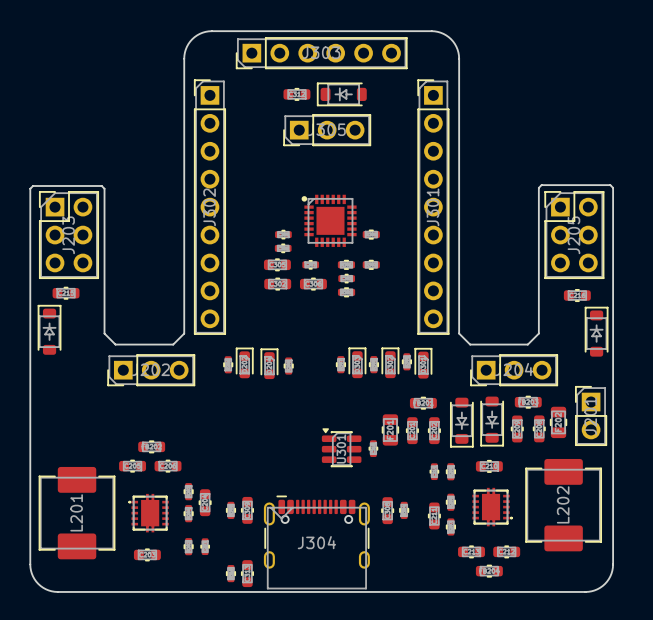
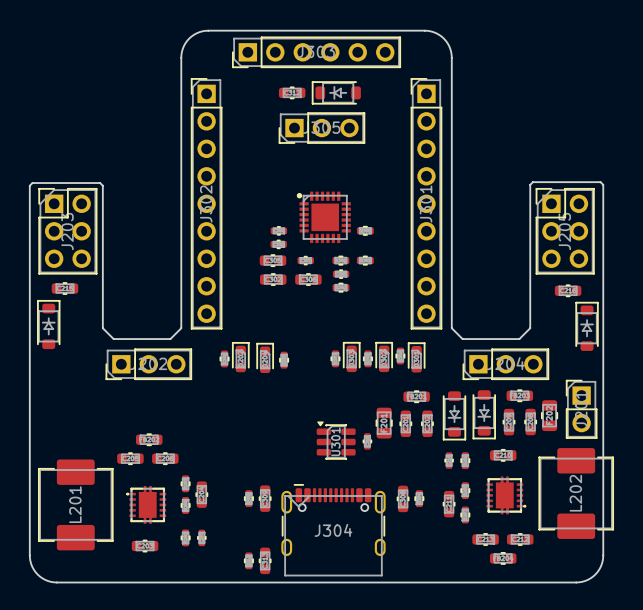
part position: (489, 466) -> (503, 455)
part position: (434, 471) -> (449, 460)
part position: (450, 471) -> (465, 460)
part position: (450, 502) -> (465, 490)
L202 position: (563, 505) -> (576, 493)
part position: (492, 507) -> (506, 495)
part position: (230, 510) -> (248, 498)
part position: (247, 510) -> (265, 498)
part position: (387, 510) -> (403, 498)
part position: (404, 510) -> (419, 498)
part position: (434, 515) -> (449, 504)
part position: (450, 526) -> (465, 514)
J304 position: (316, 542) -> (333, 530)
part position: (471, 551) -> (485, 539)
part position: (506, 551) -> (520, 539)
part position: (489, 571) -> (503, 558)
part position: (230, 573) -> (248, 560)
part position: (247, 573) -> (265, 560)

